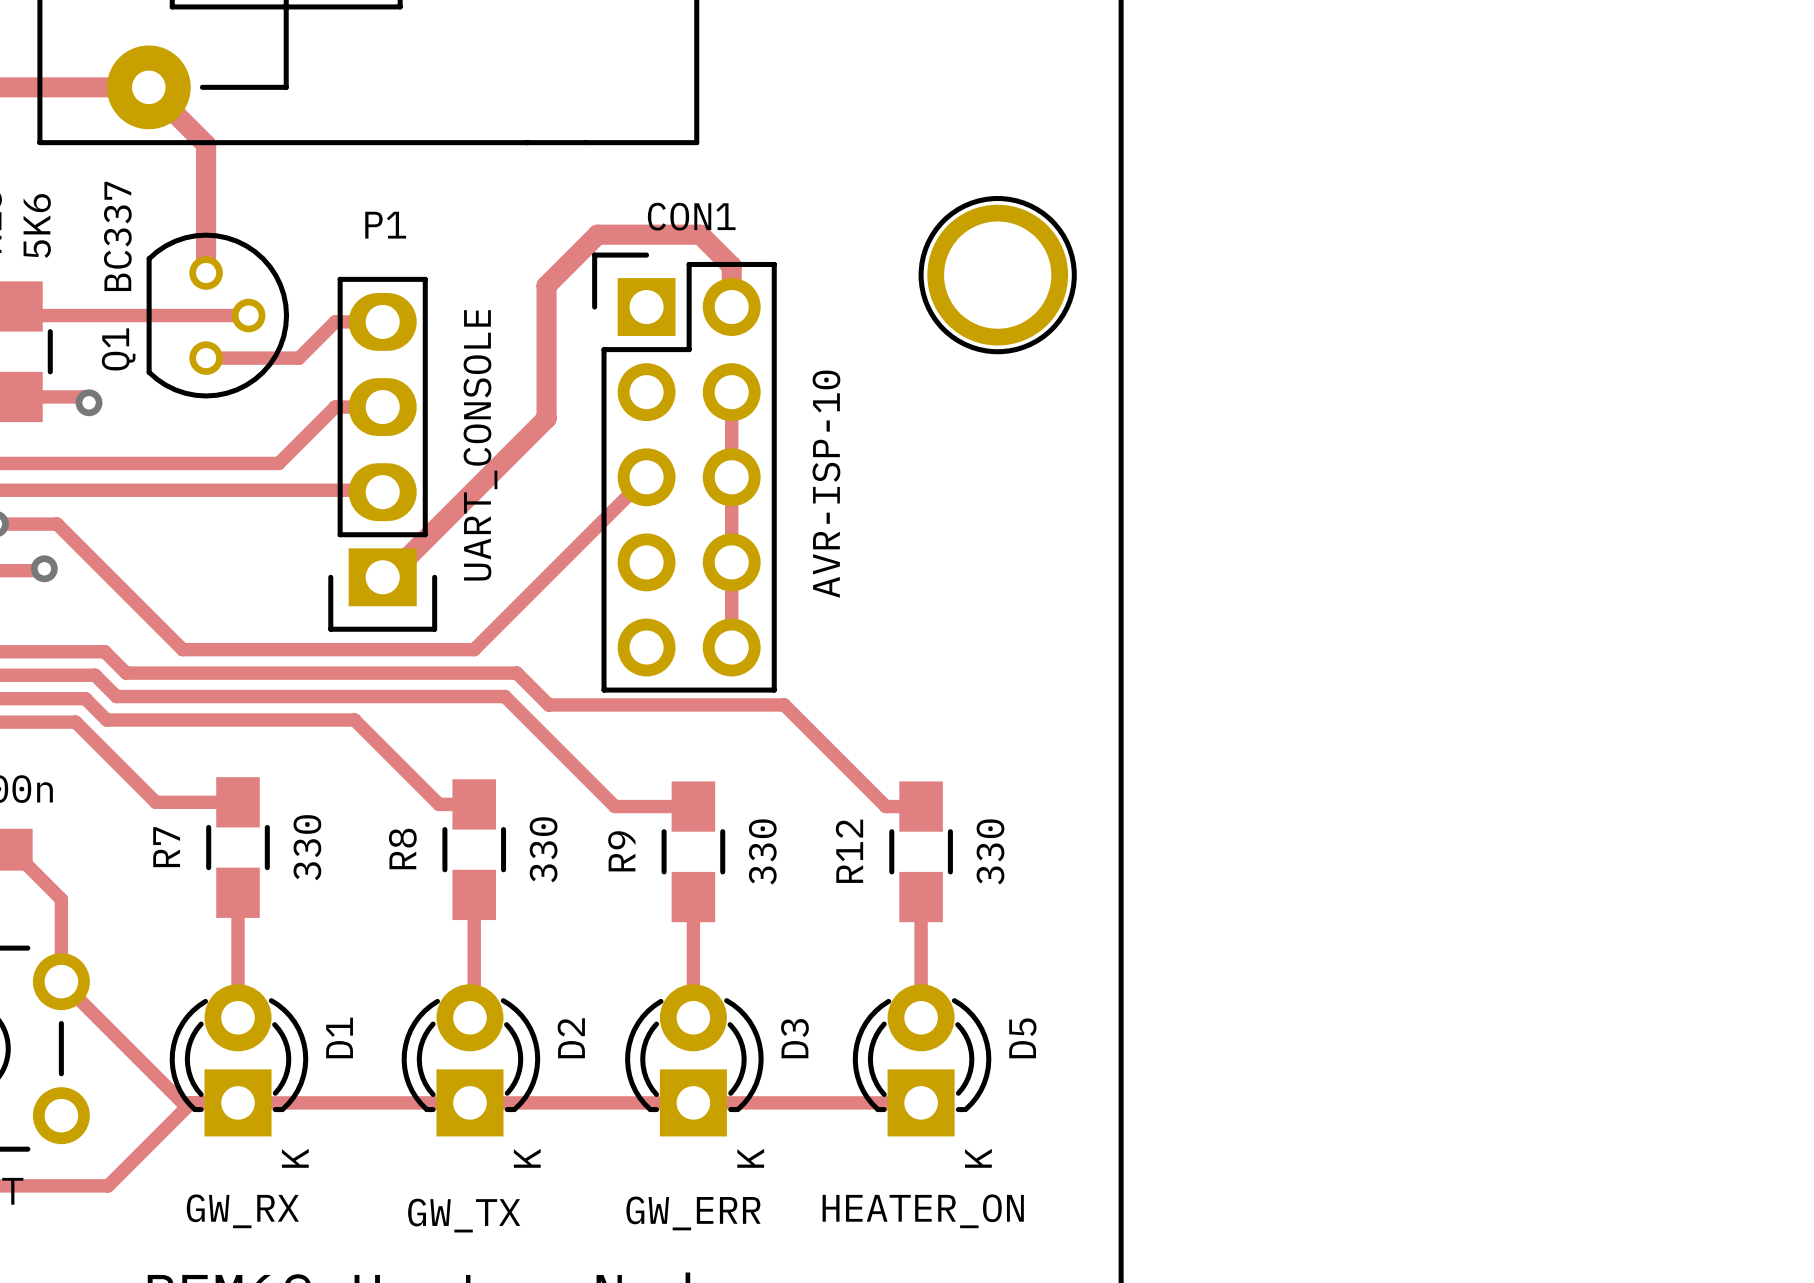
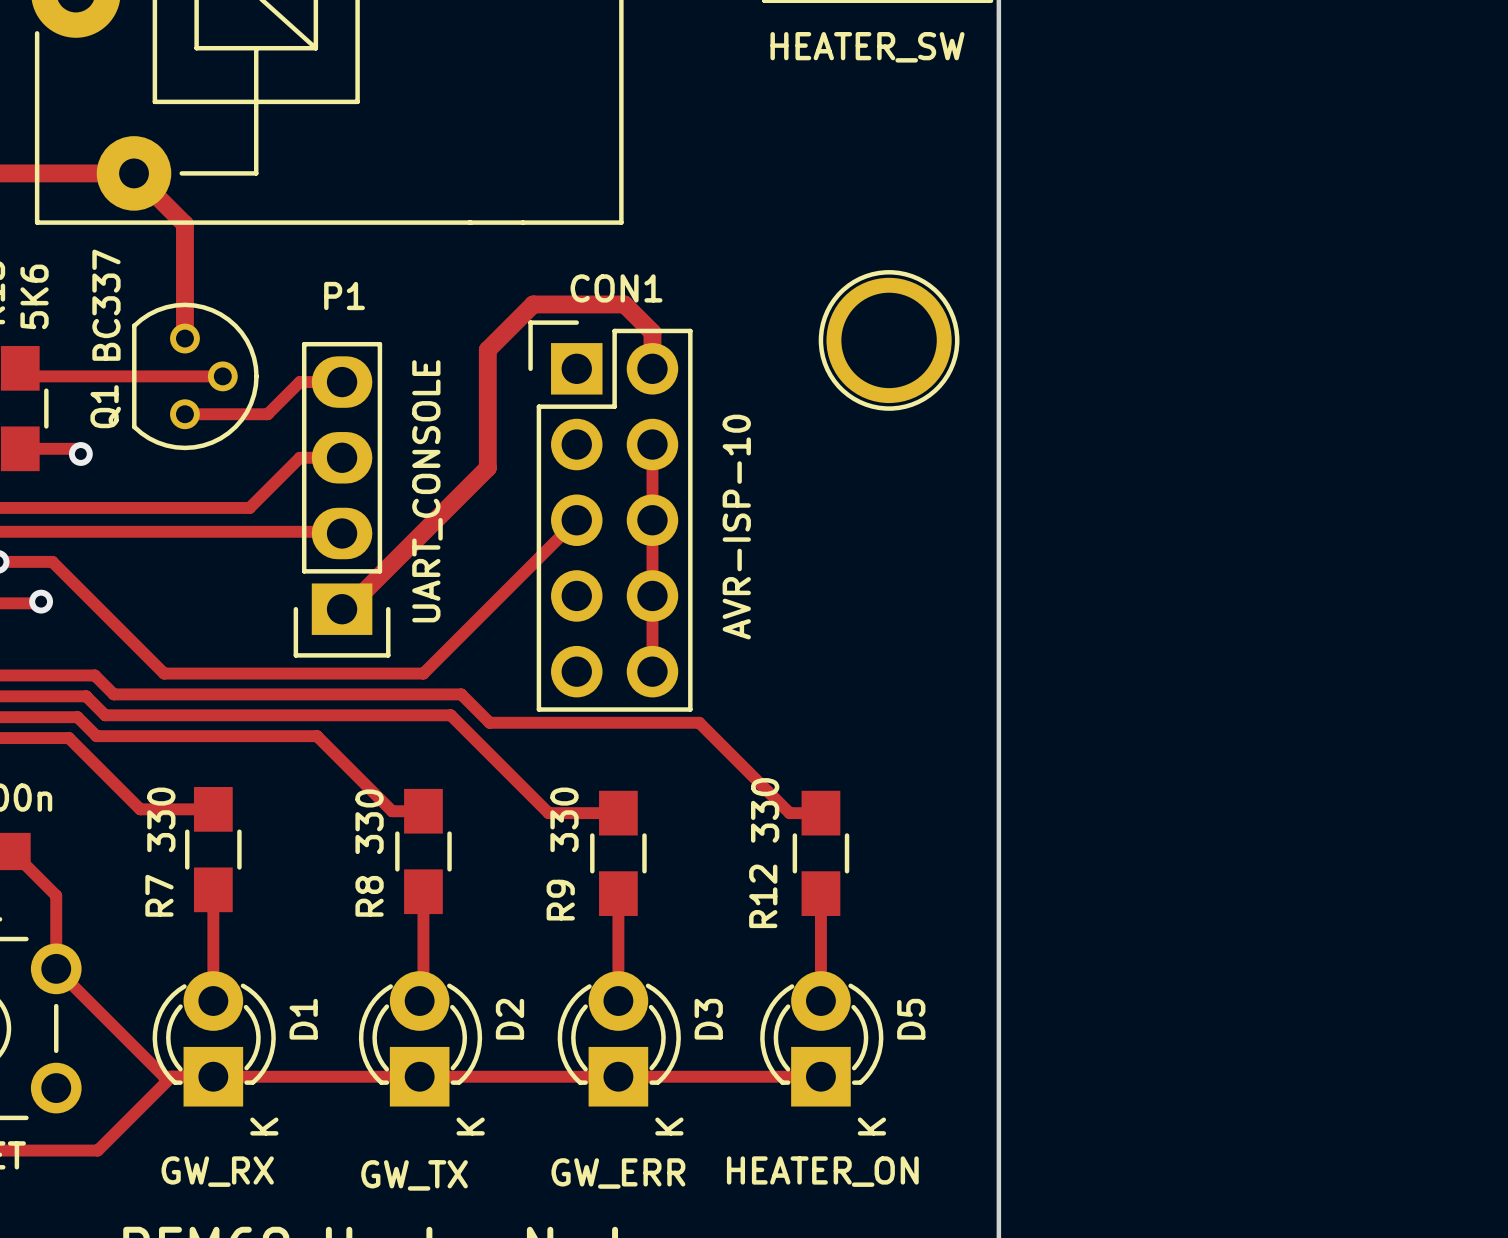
R7 name position: R7 (166, 847) -> R7 (159, 895)
R7 value position: 330 (307, 847) -> 330 (161, 819)
R8 name position: R8 (402, 849) -> R8 (369, 896)
R8 value position: 330 (543, 849) -> 330 (369, 821)
R9 name position: R9 (621, 851) -> R9 (560, 900)
R9 value position: 330 (762, 851) -> 330 (564, 819)
R12 name position: R12 (849, 851) -> R12 (763, 896)
R12 value position: 330 (990, 851) -> 330 (765, 810)

